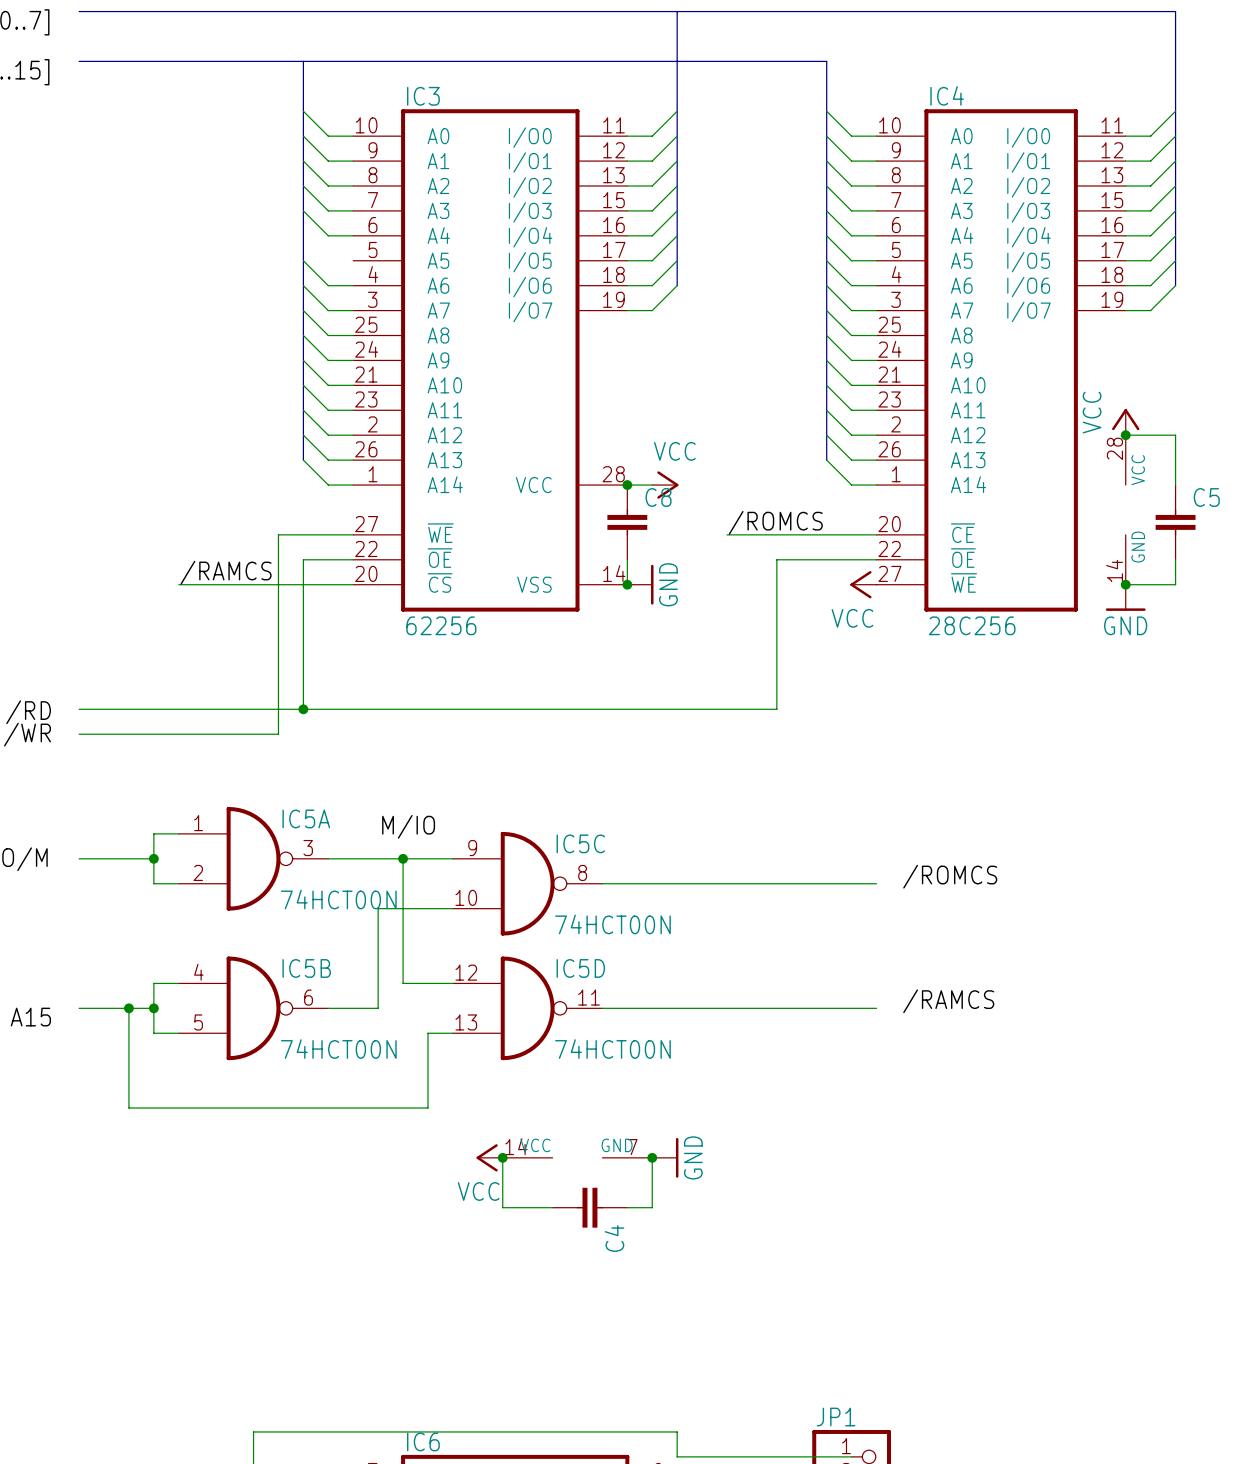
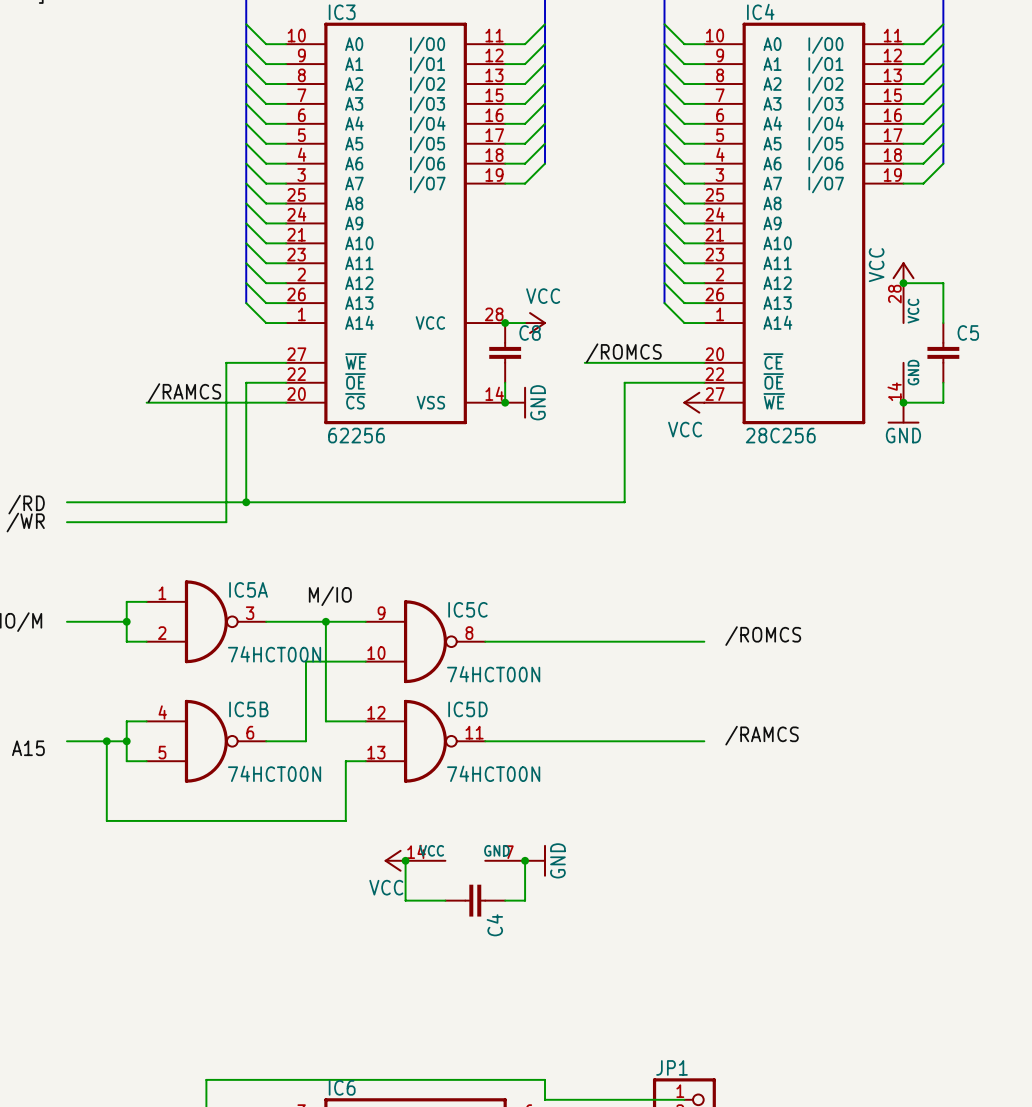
wire: none -> (246, 123) (266, 143) (286, 143)

